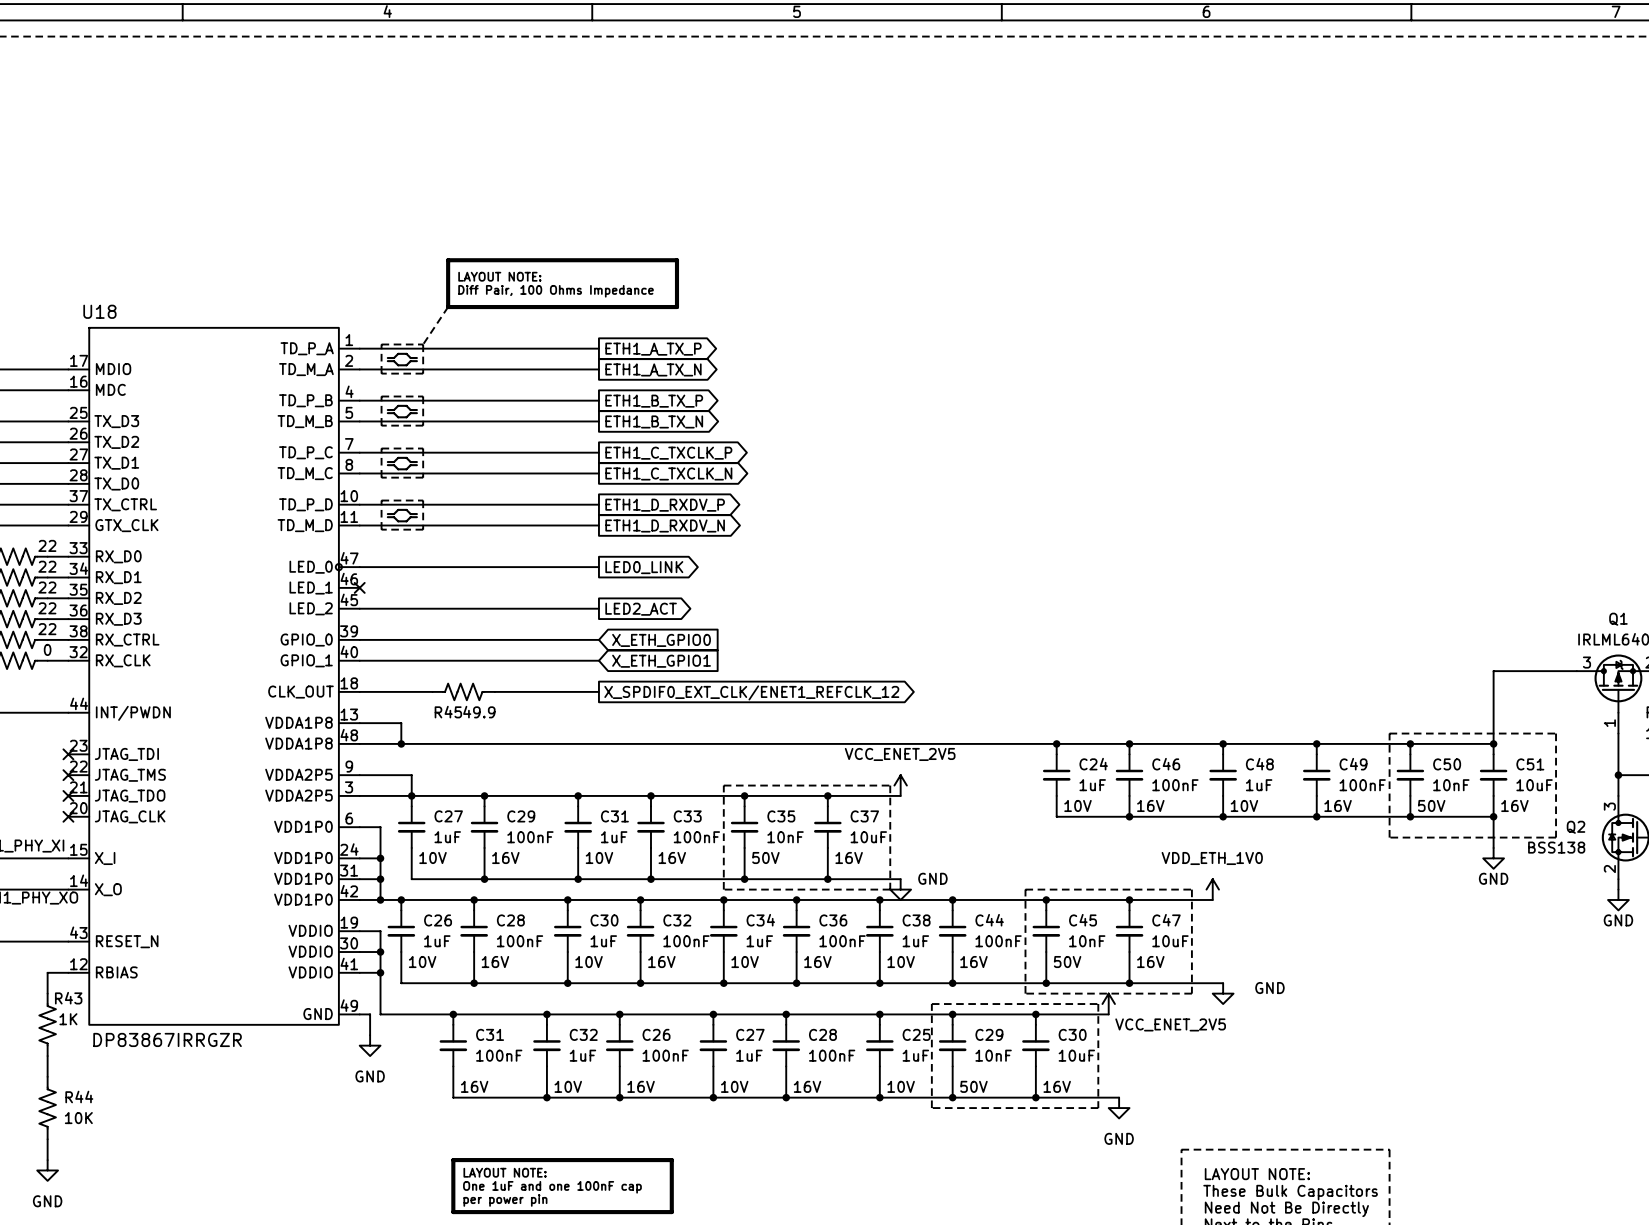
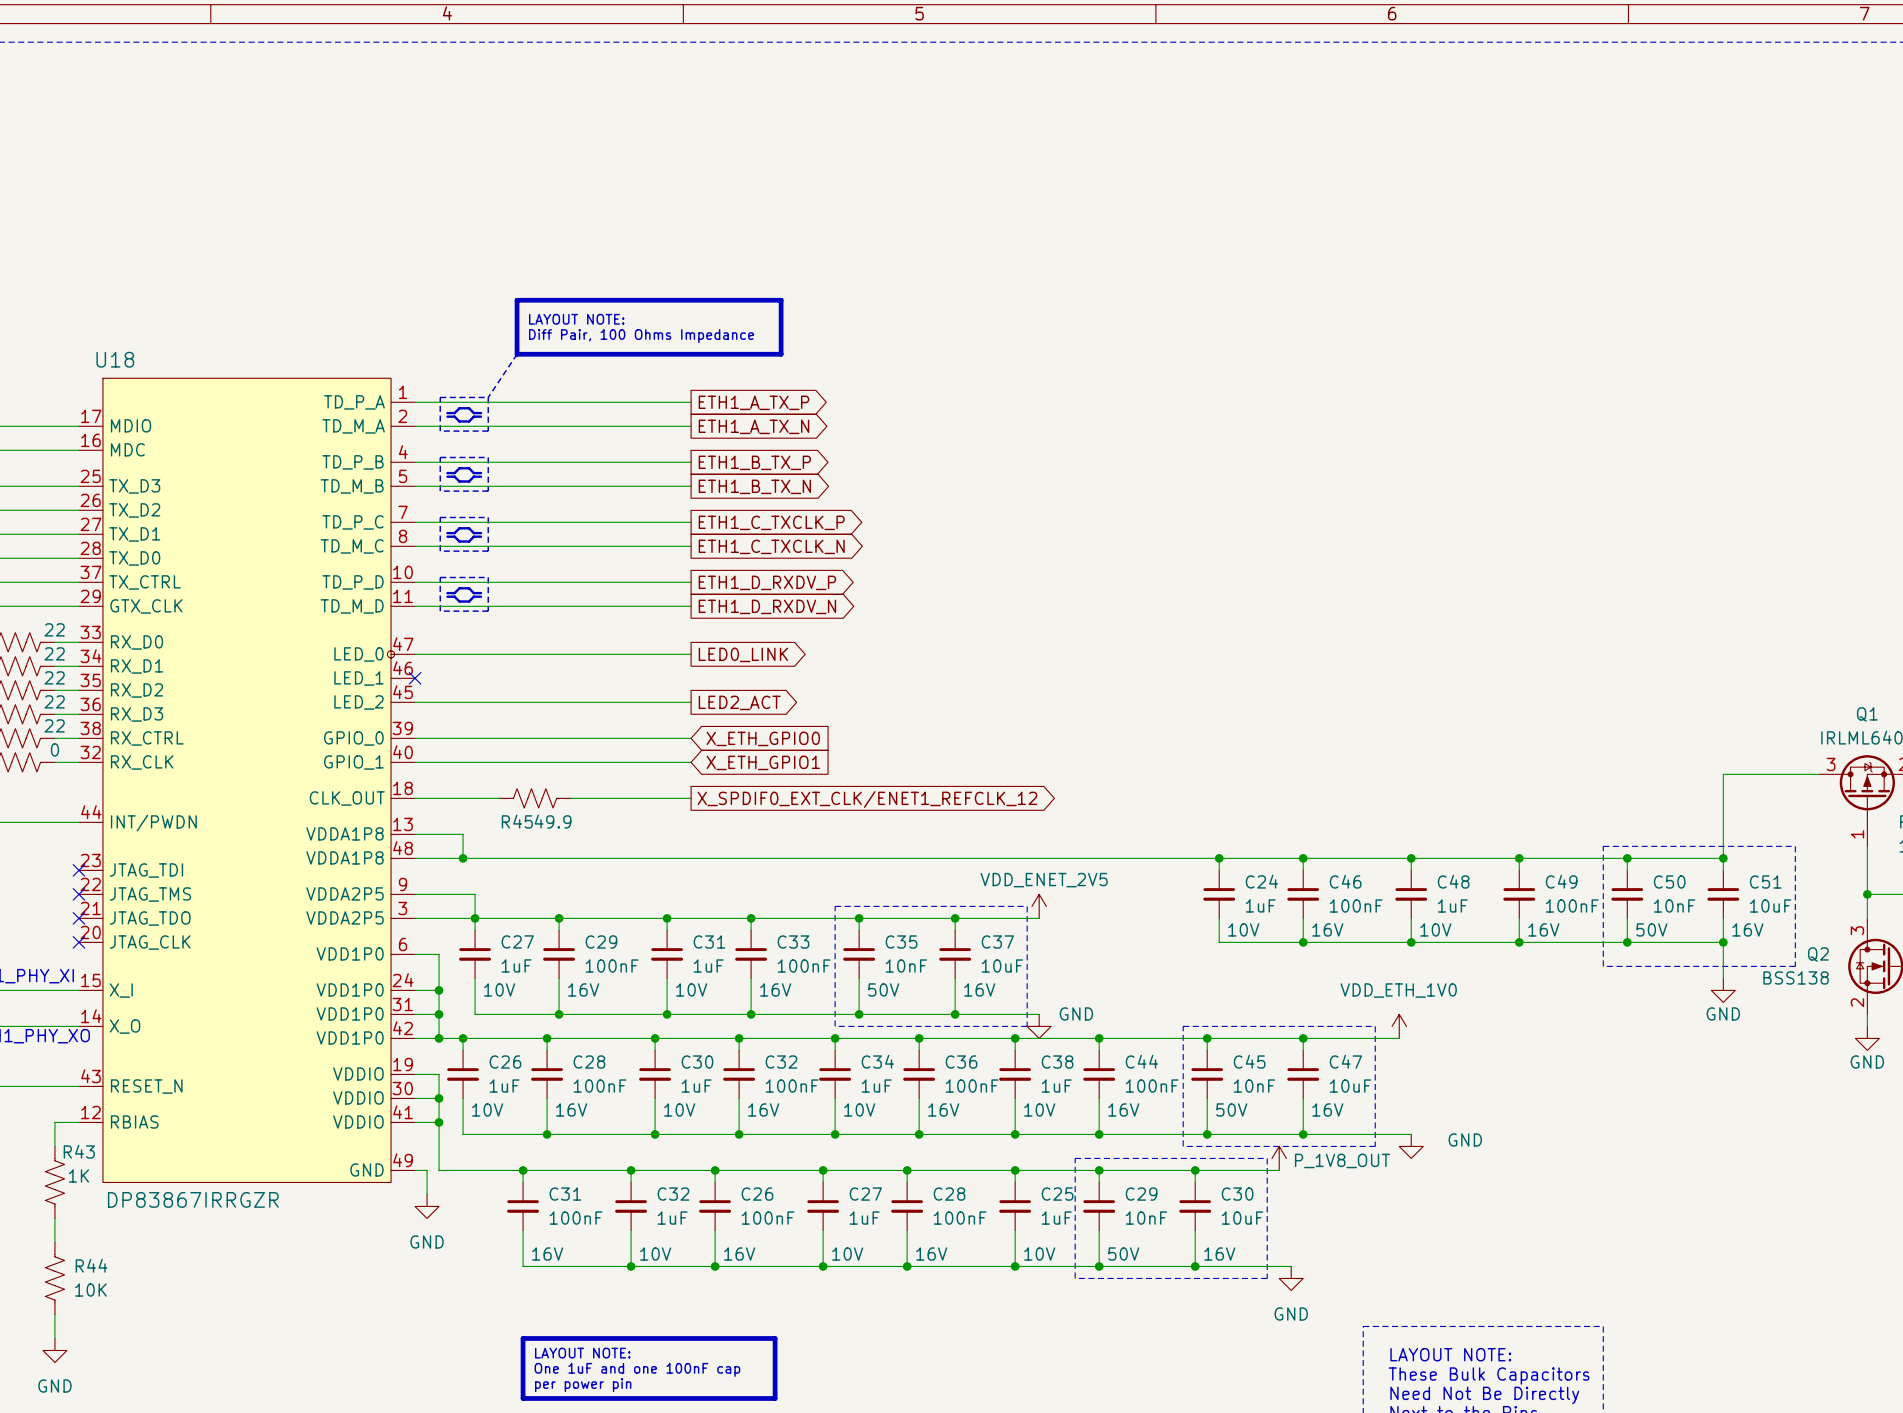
power symbol: VCC_ENET_2V5 (900, 785) -> VDD_ENET_2V5 (1039, 906)
power symbol: VCC_ENET_2V5 (1108, 1004) -> P_1V8_OUT (1279, 1158)

